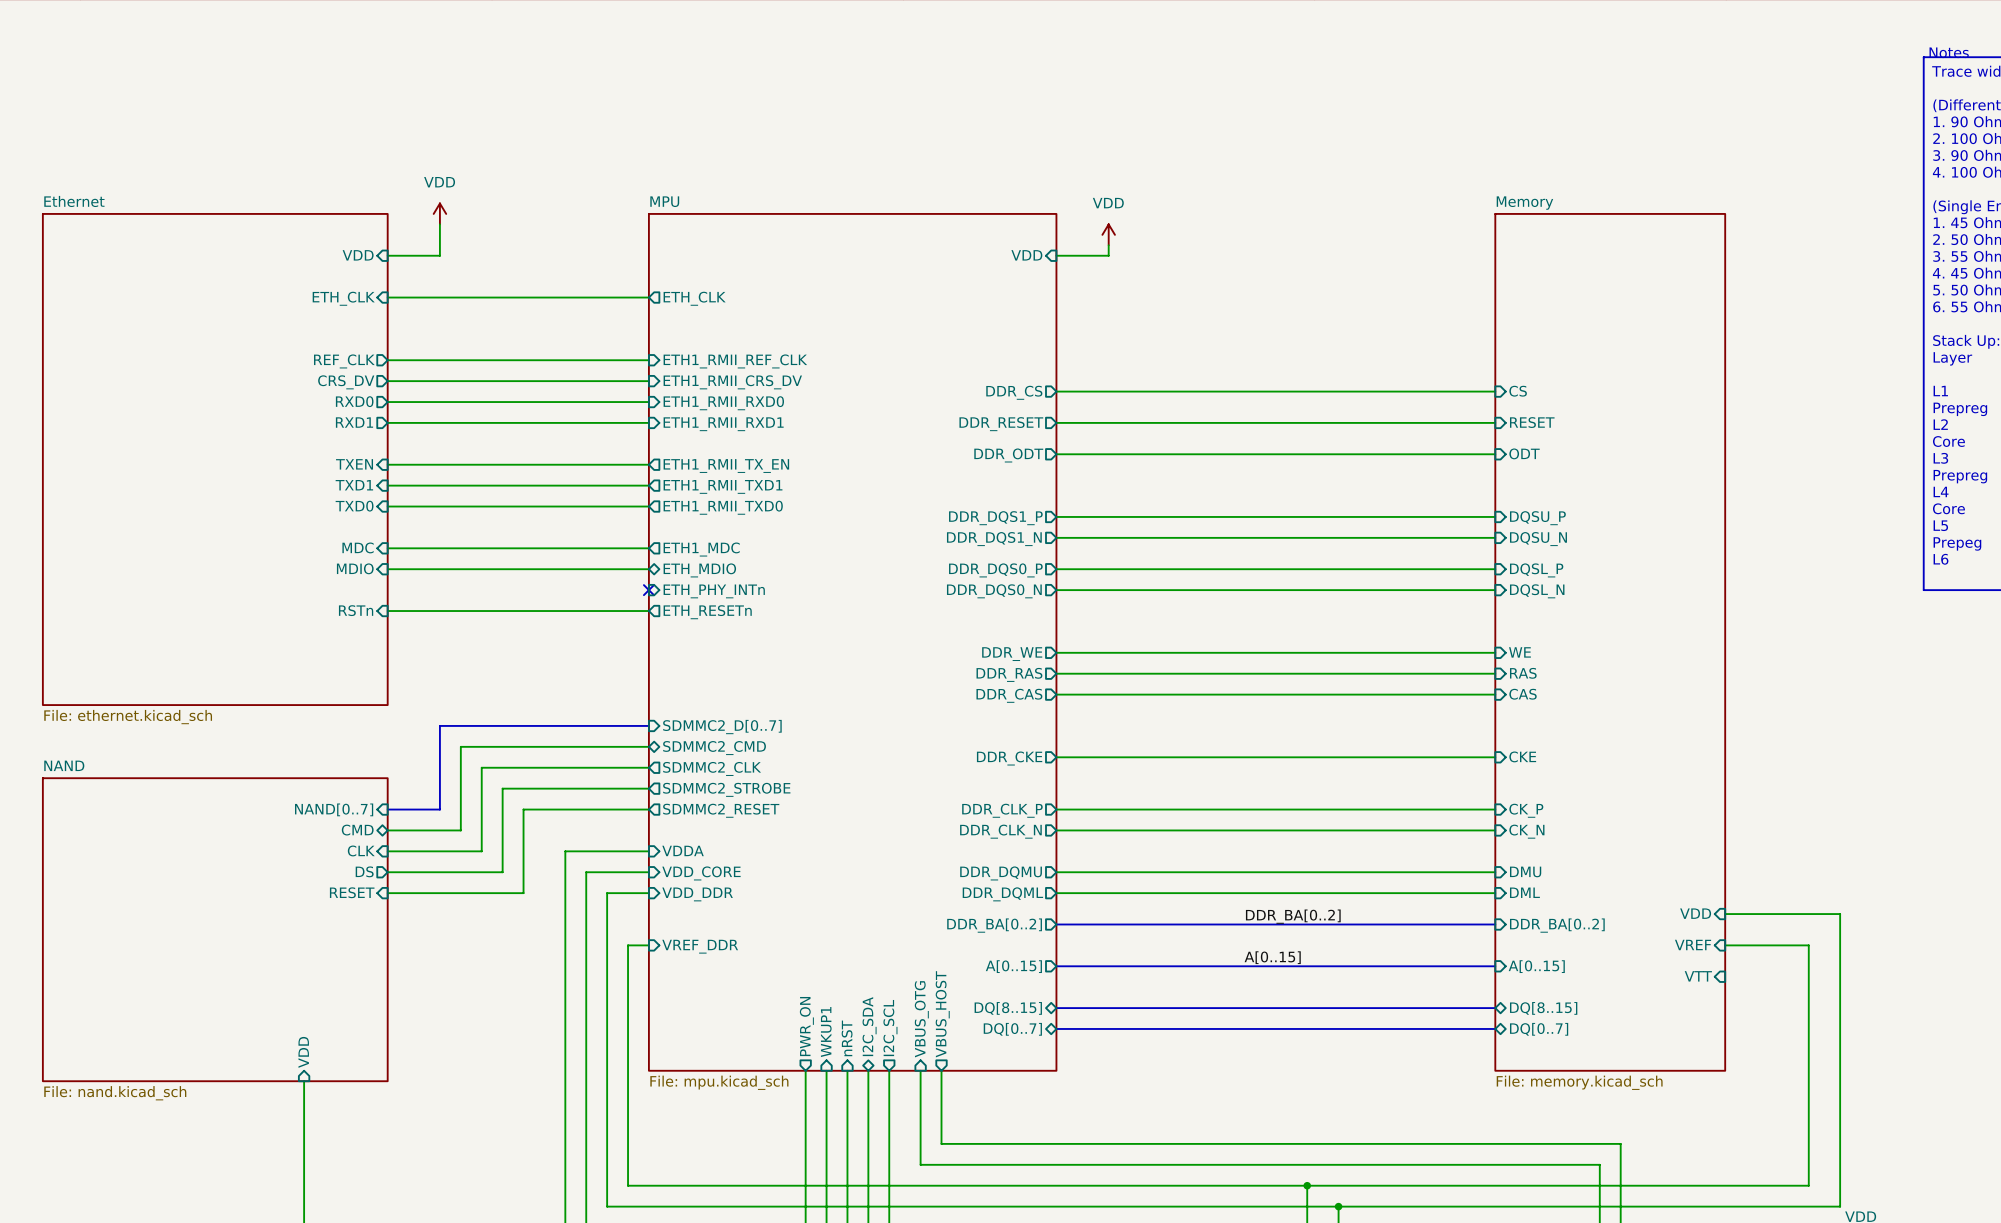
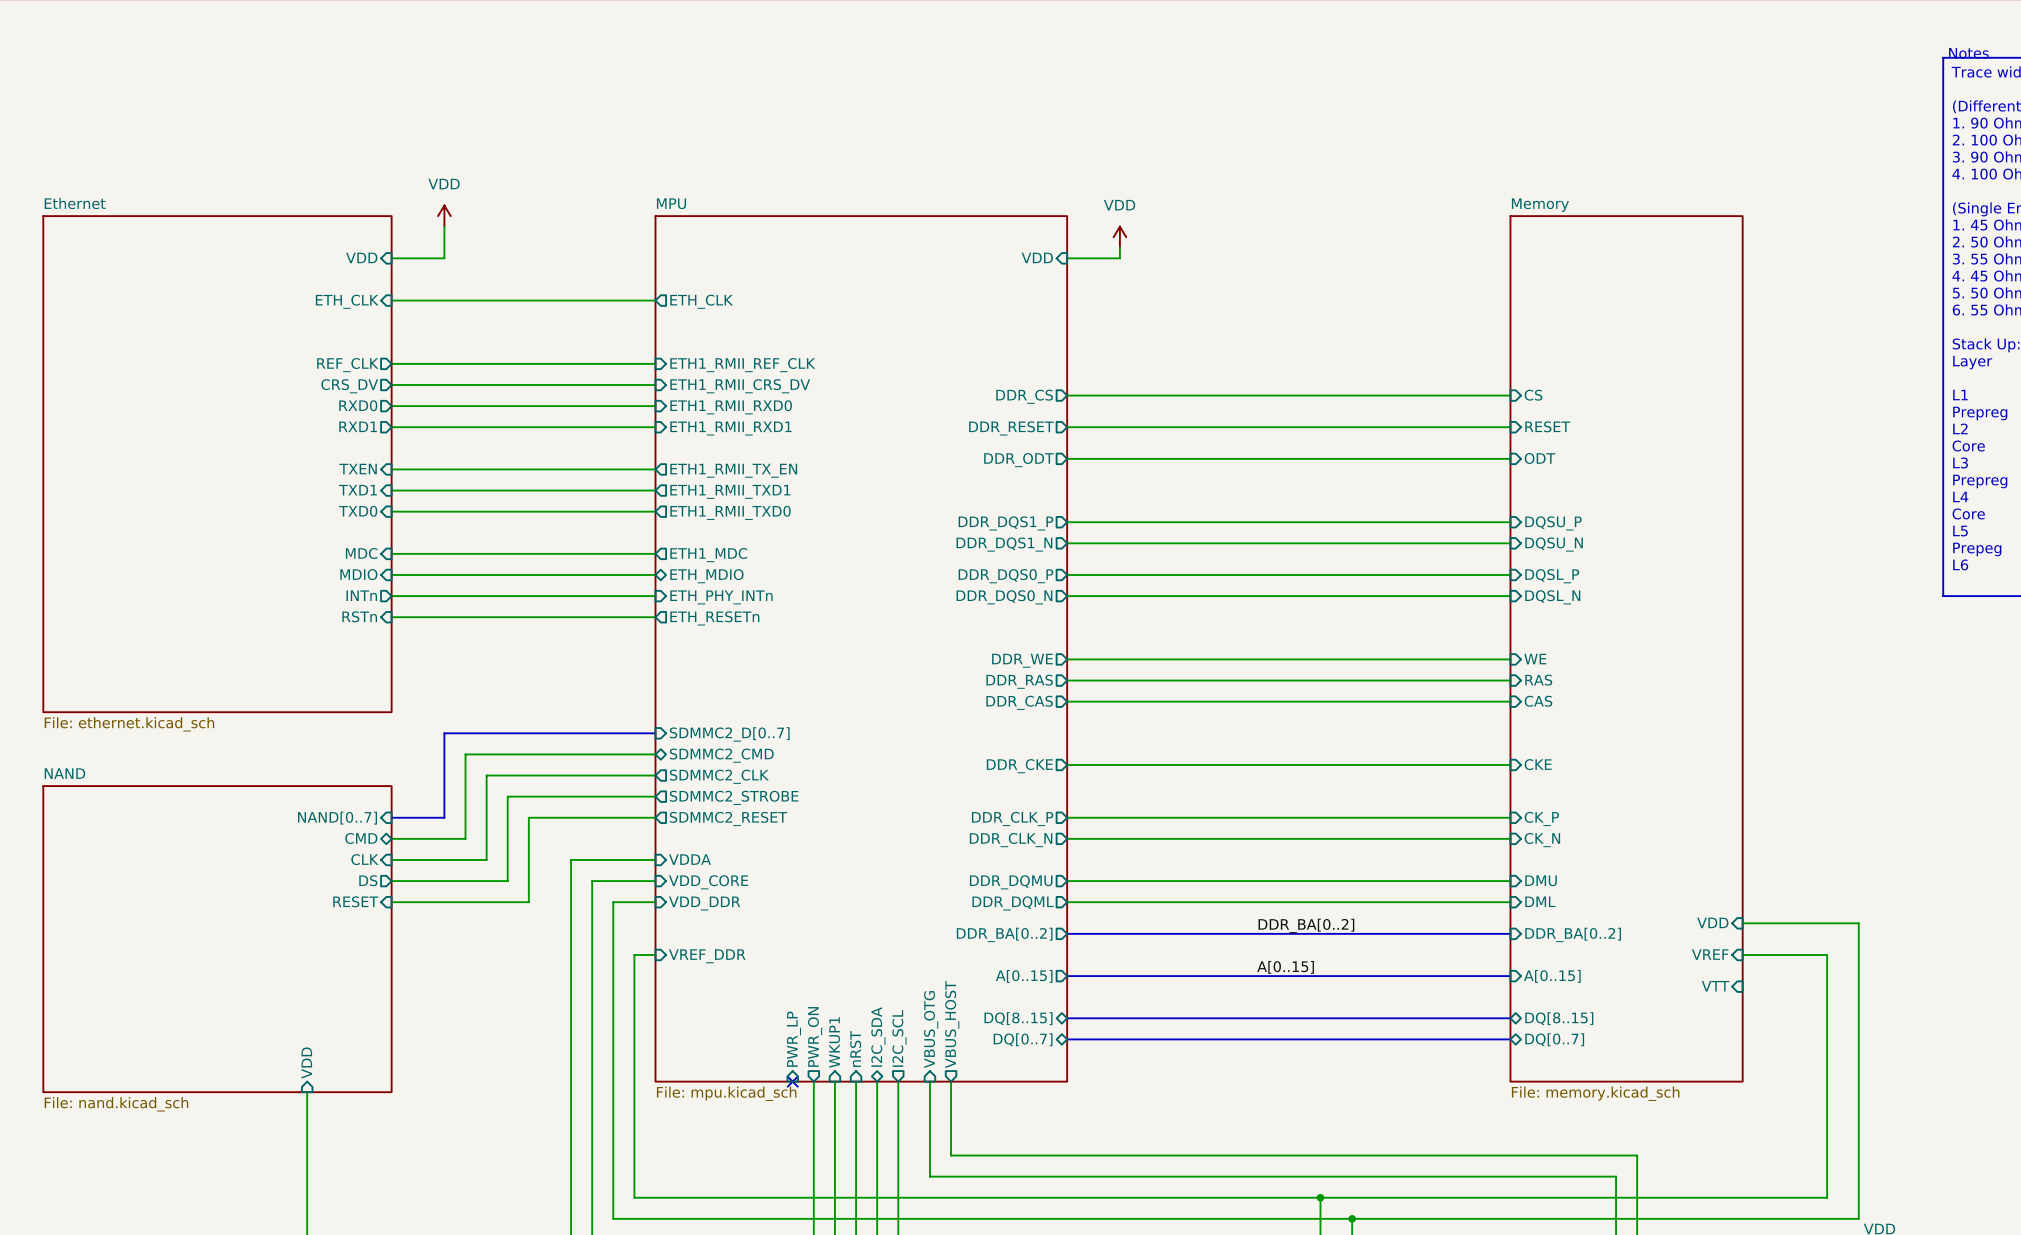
sheet pin: none -> INTn (361, 595)
wire: none -> (391, 596) (655, 596)
no-connect mark: (648, 590) -> none
sheet pin: none -> PWR_LP (794, 1039)
no-connect mark: none -> (792, 1081)

